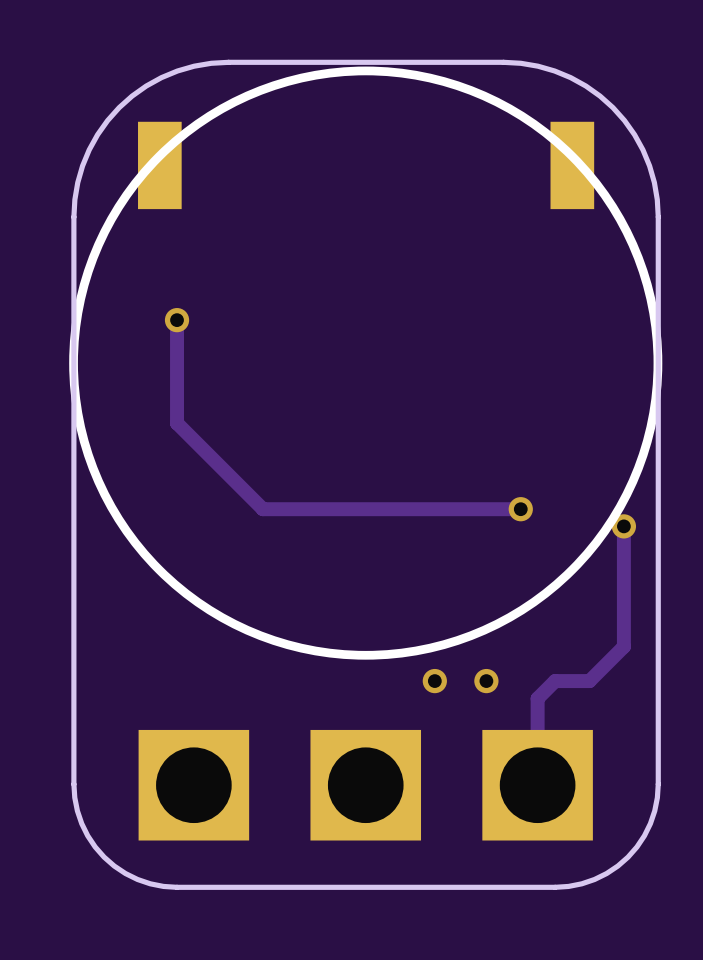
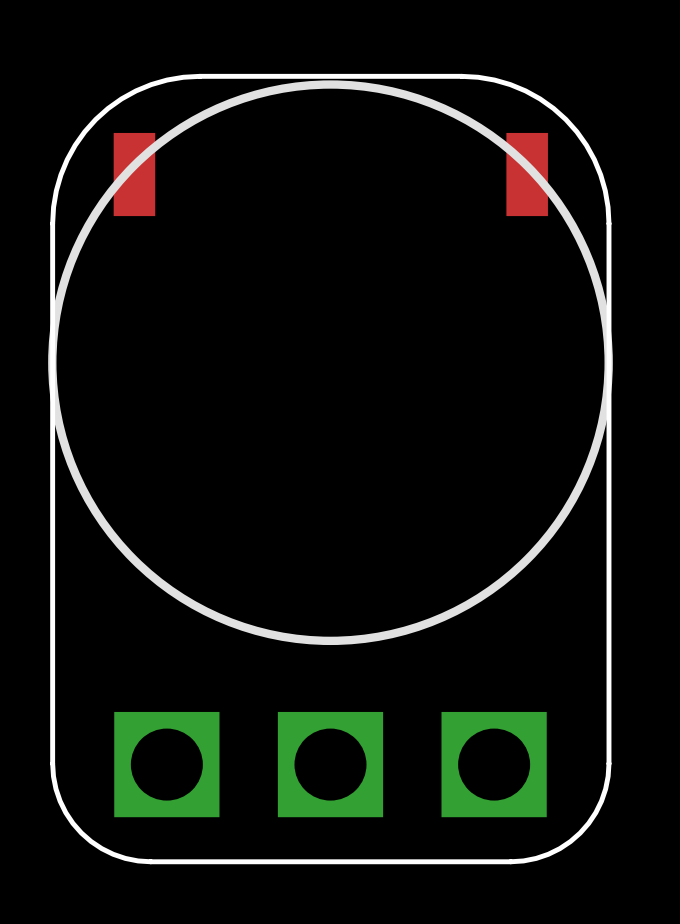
track: (177, 320) (177, 423) (262, 509) (520, 509) -> none
via: (177, 320) -> none
via: (520, 509) -> none
track: (623, 526) (623, 646) (589, 681) (555, 681) (537, 698) (537, 785) -> none
via: (623, 526) -> none
via: (434, 681) -> none
via: (486, 681) -> none

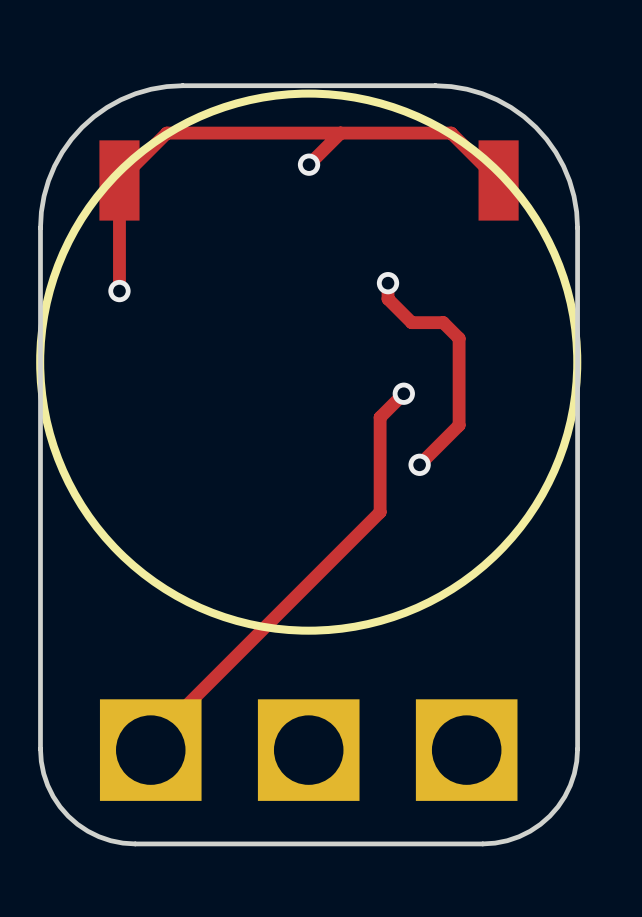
track: none -> (340, 133) (309, 164)
via: none -> (309, 164)
track: none -> (498, 180) (451, 133) (166, 133) (119, 180) (119, 291)
track: none -> (388, 283) (388, 298) (411, 322) (443, 322) (459, 338) (459, 425) (419, 464)
via: none -> (388, 283)
via: none -> (119, 291)
track: none -> (403, 393) (380, 417) (380, 512) (150, 741) (150, 750)
via: none -> (403, 393)
via: none -> (419, 464)

